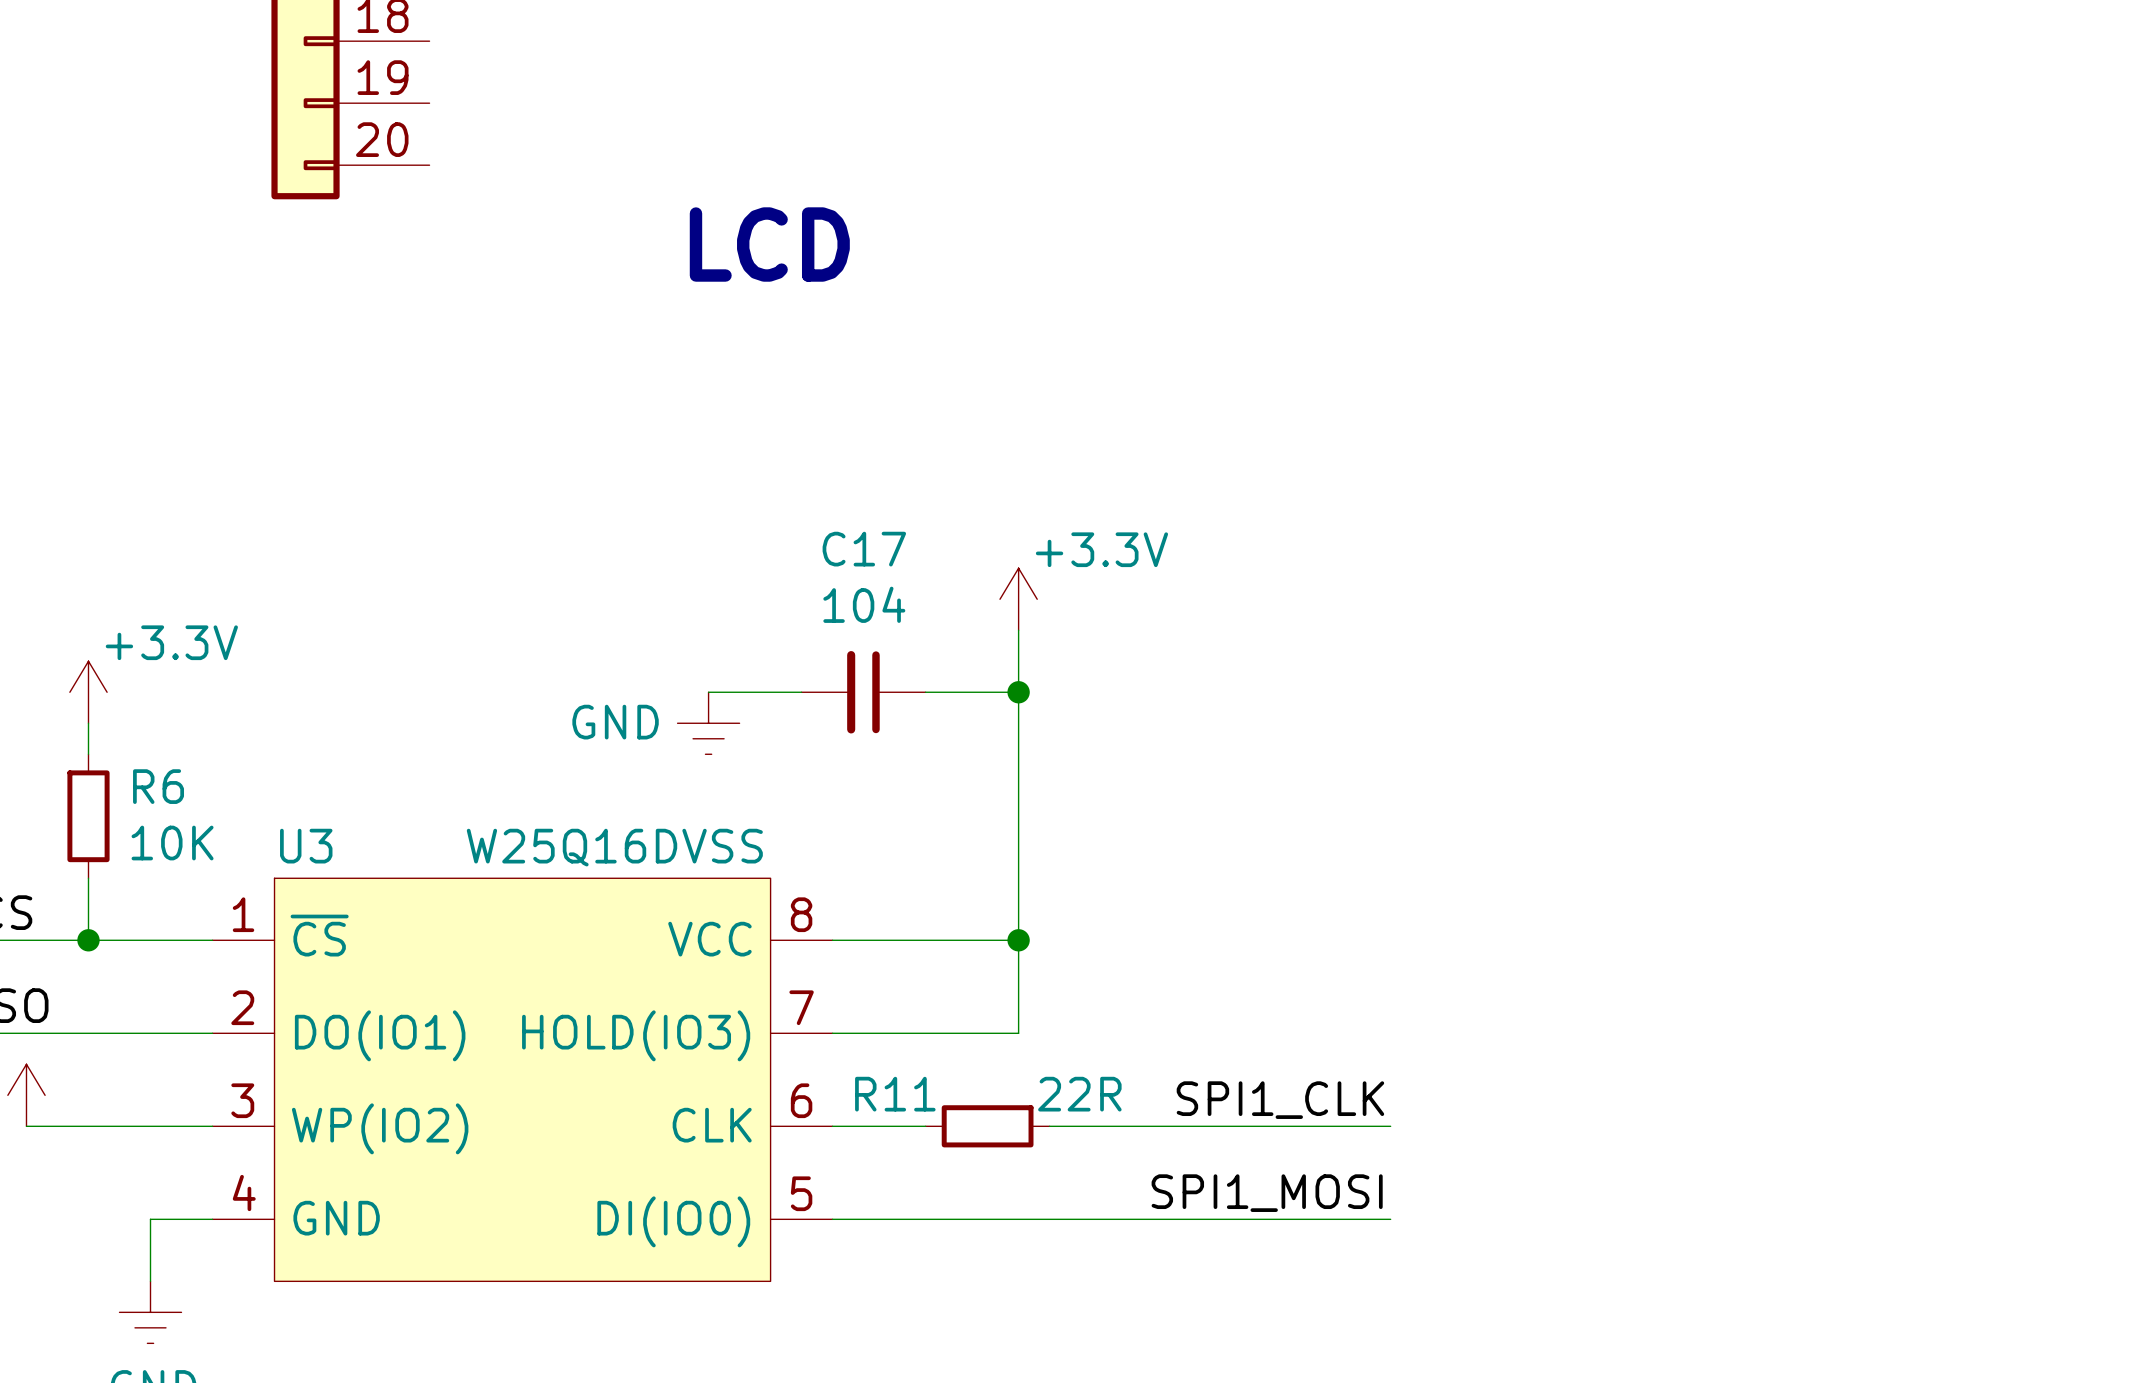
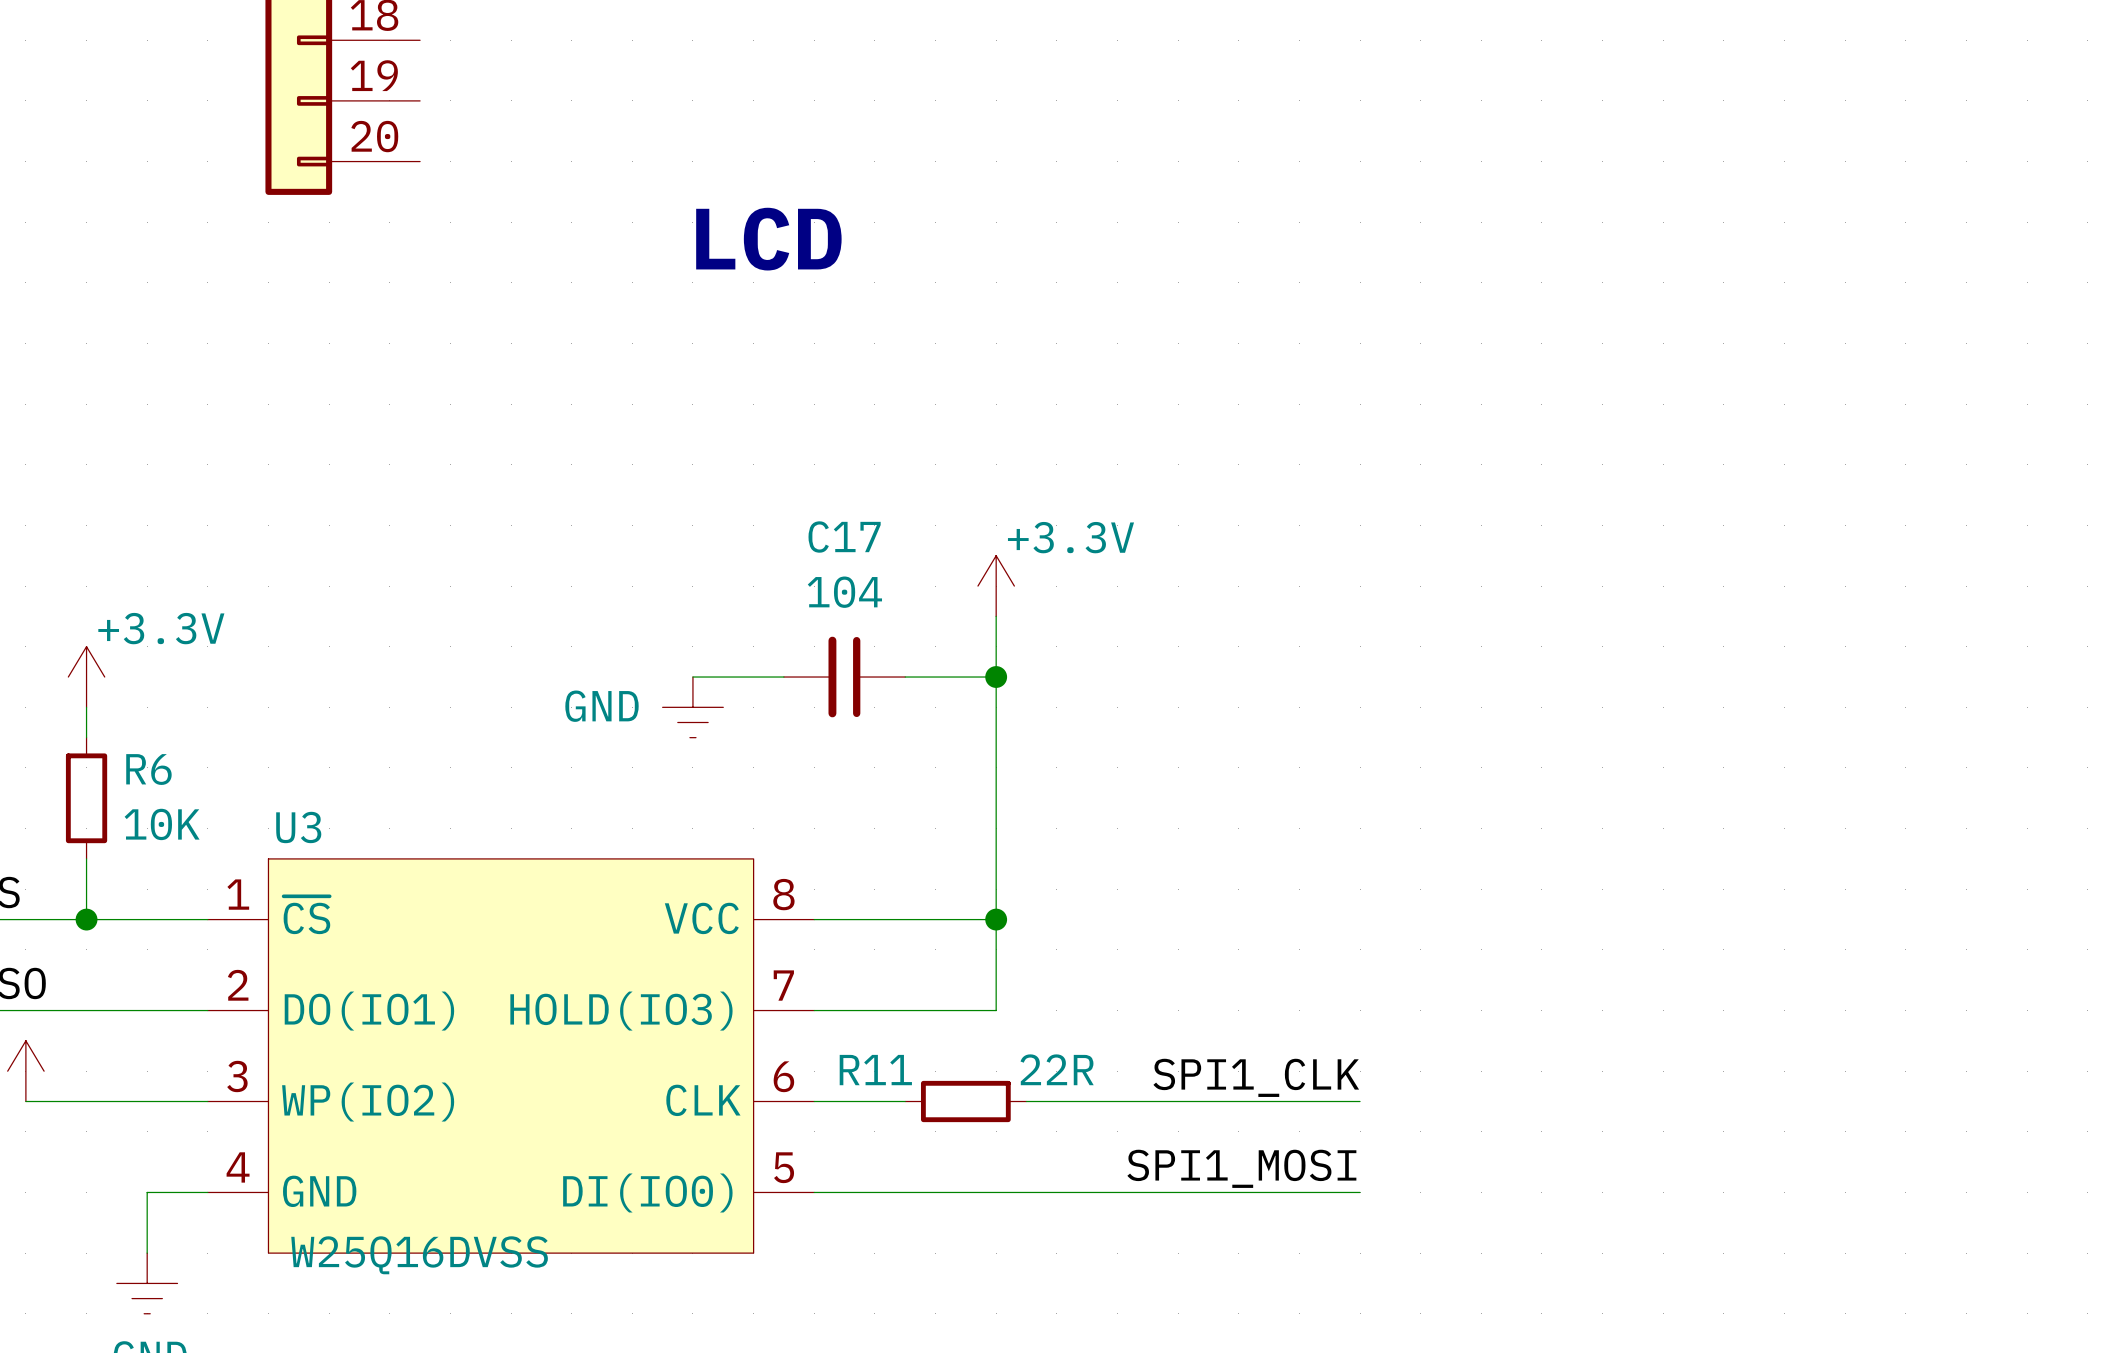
U3 value position: W25Q16DVSS (614, 847) -> W25Q16DVSS (419, 1255)

